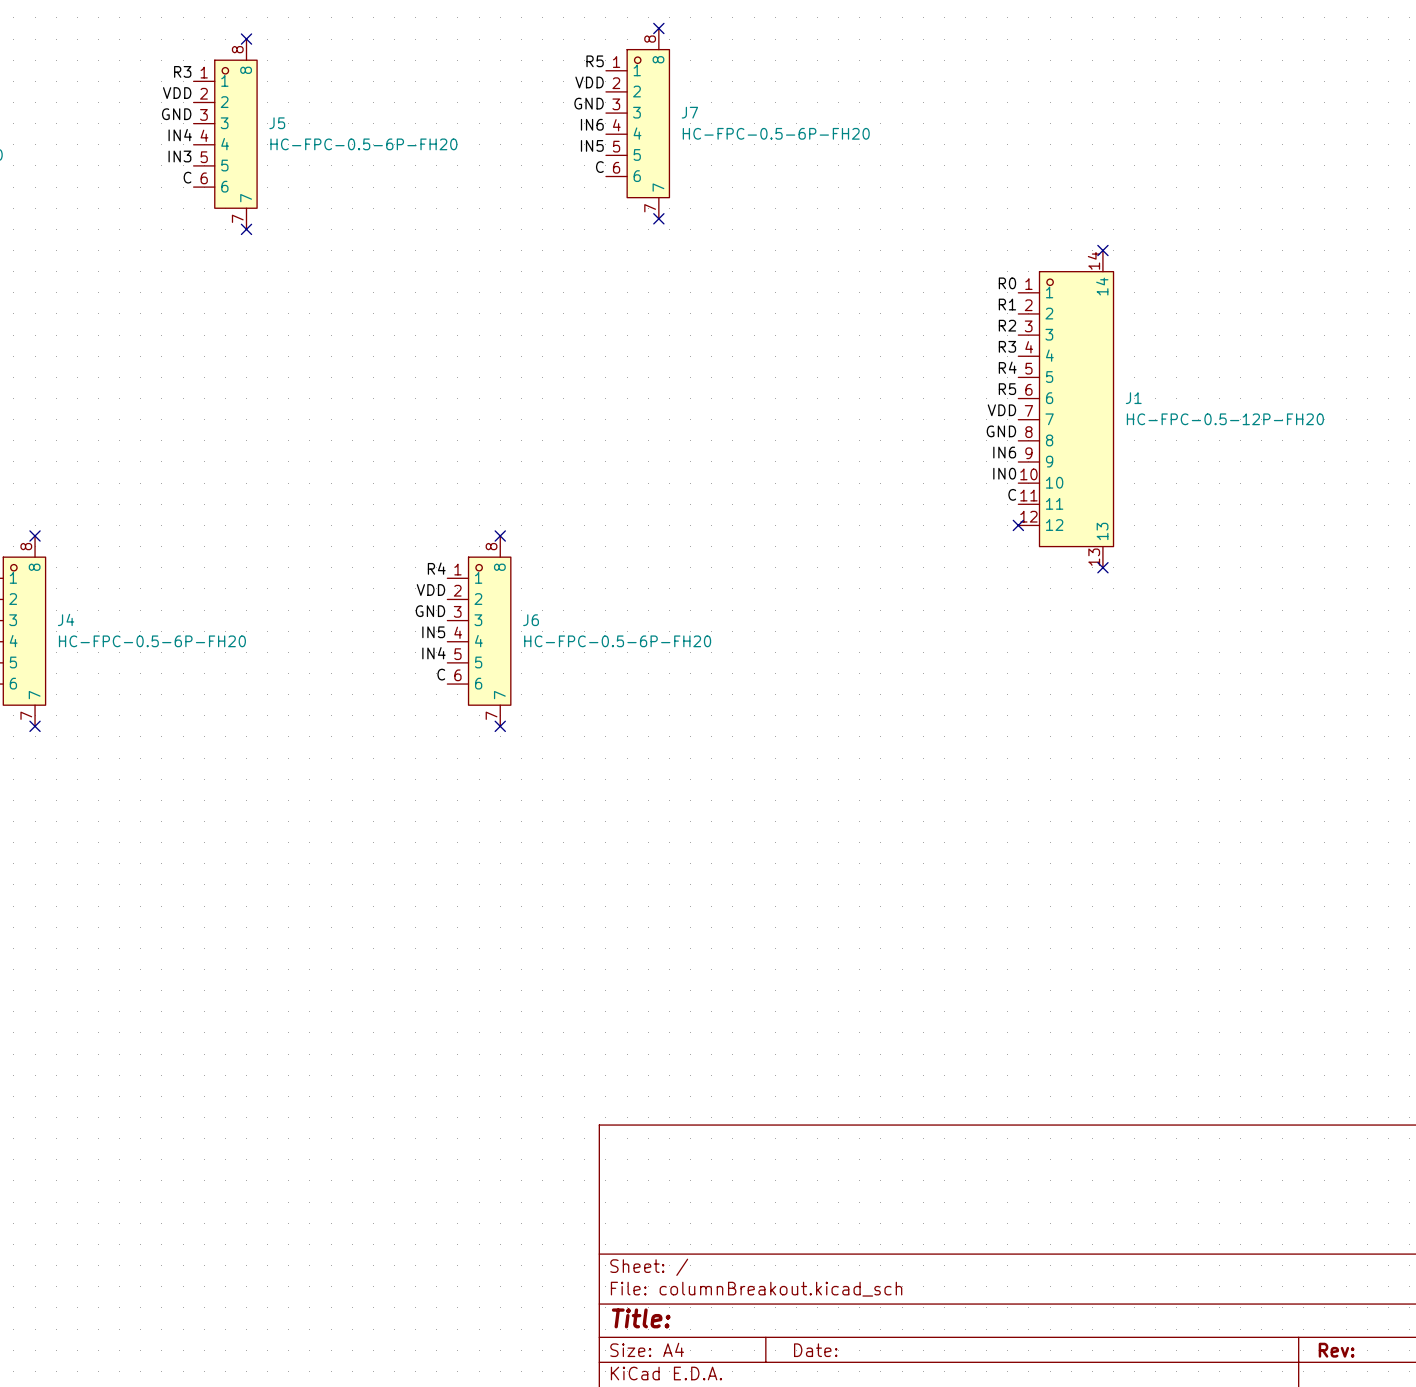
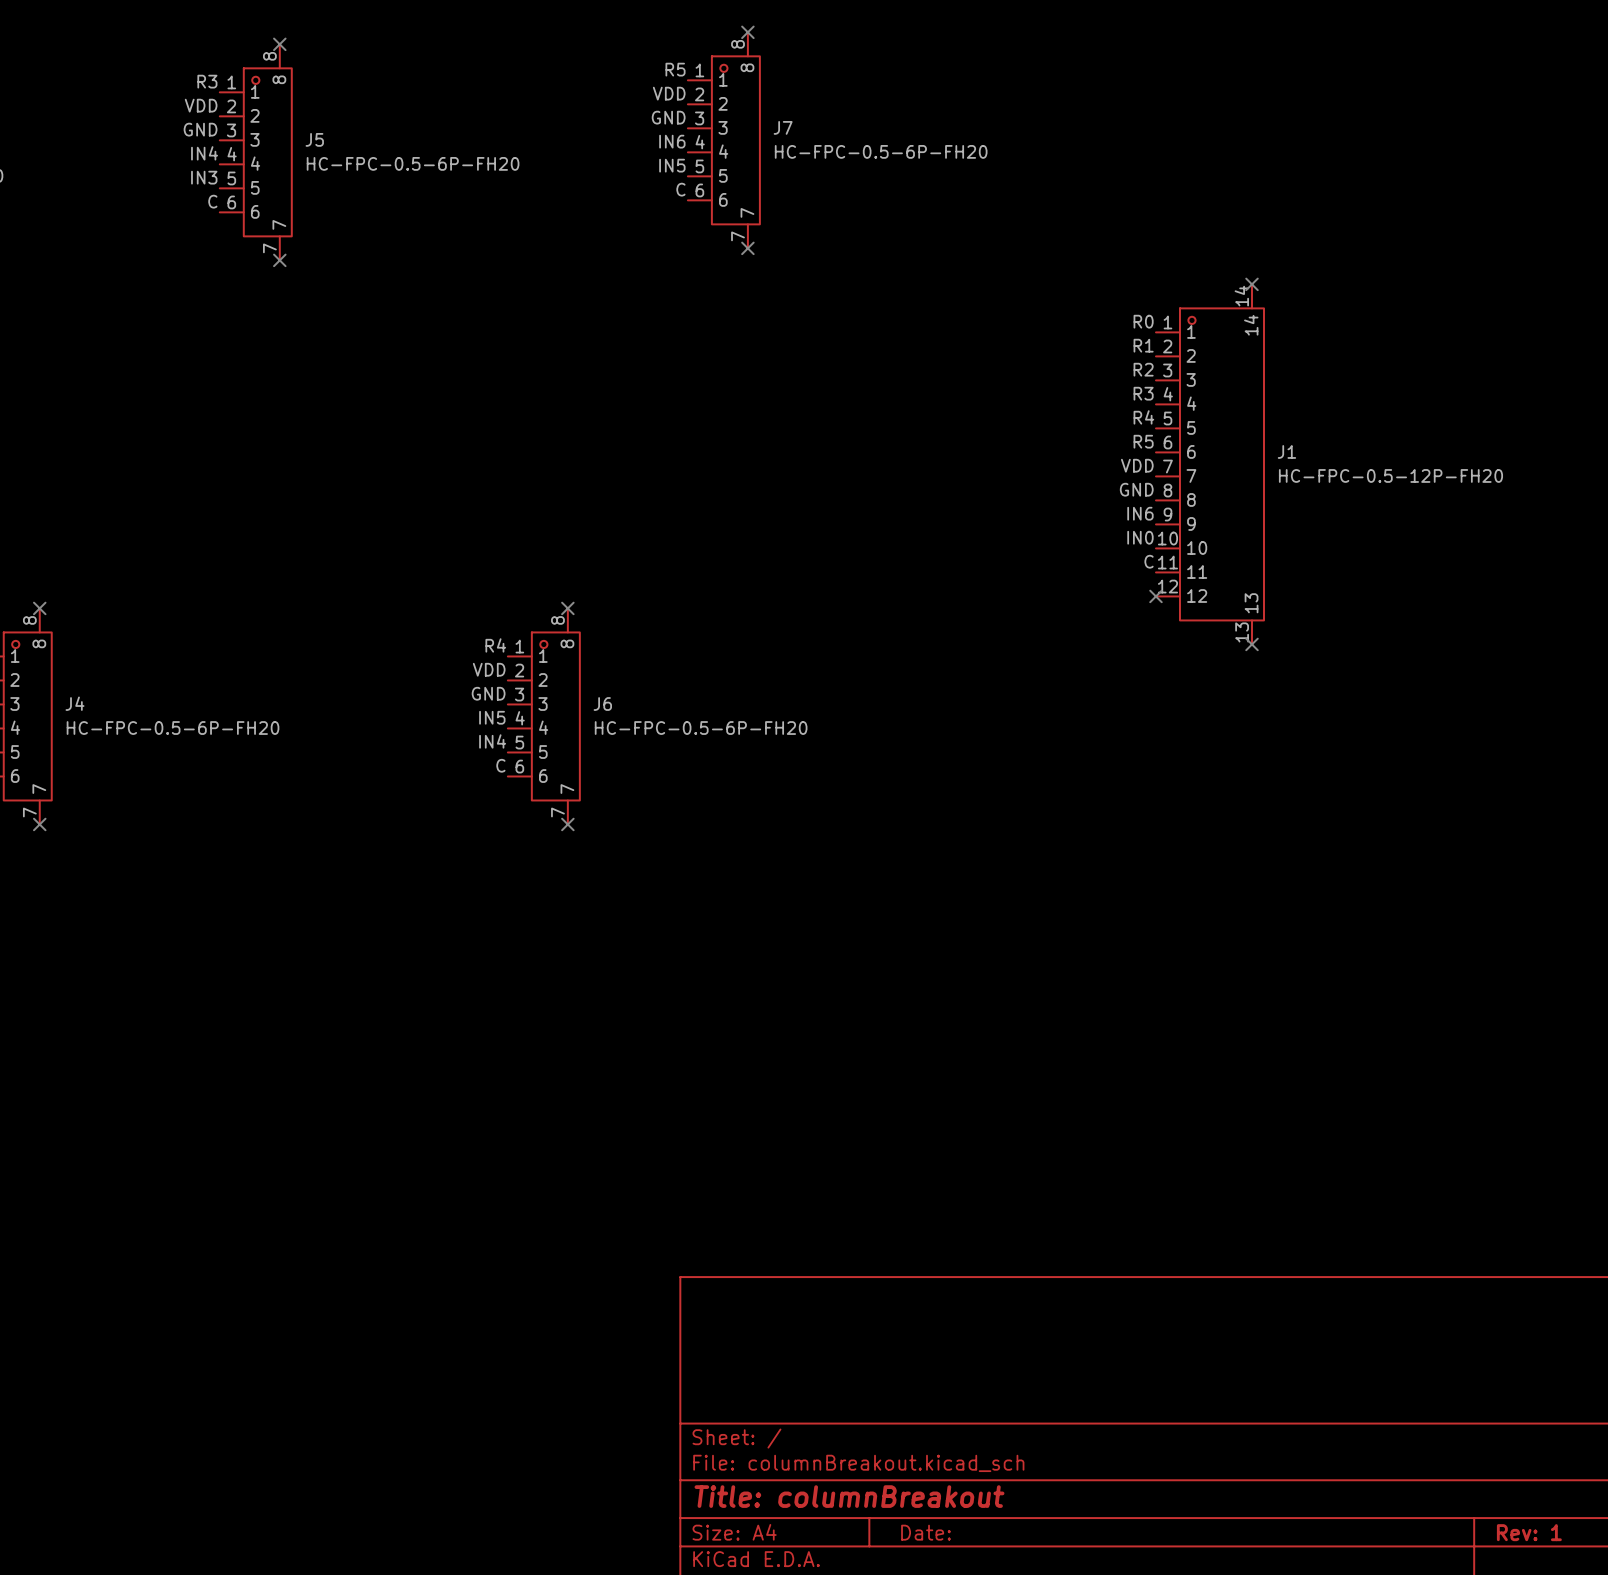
title block: Title: (641, 1318) -> Title: columnBreakout (849, 1496)
title block: Rev: (1336, 1350) -> Rev: 1 (1529, 1532)

